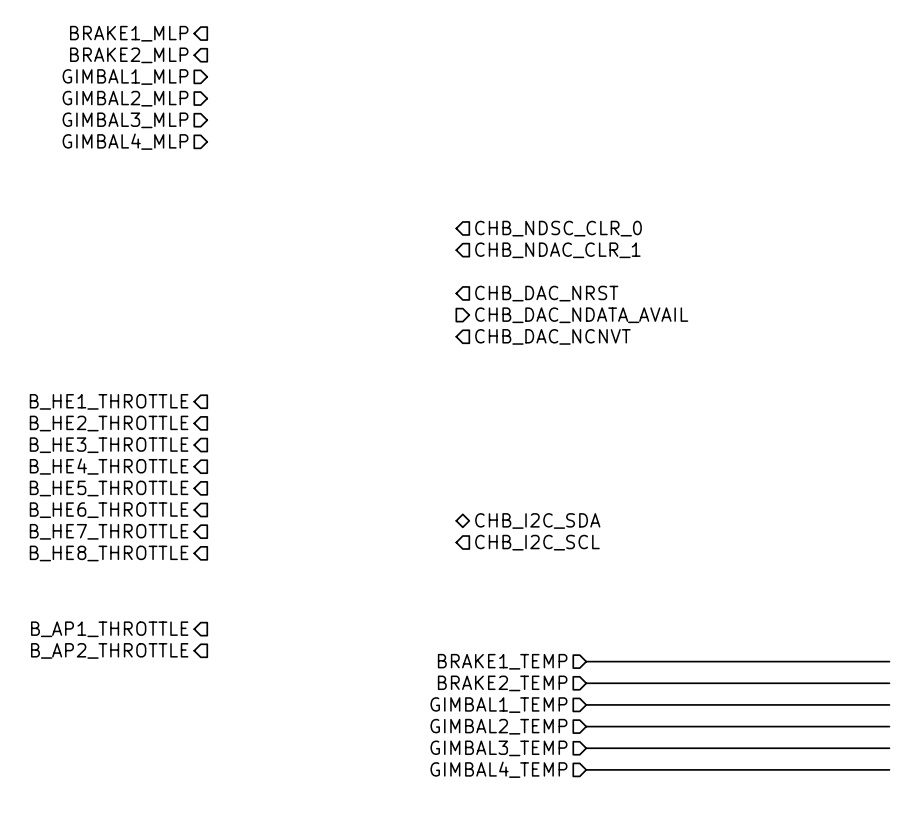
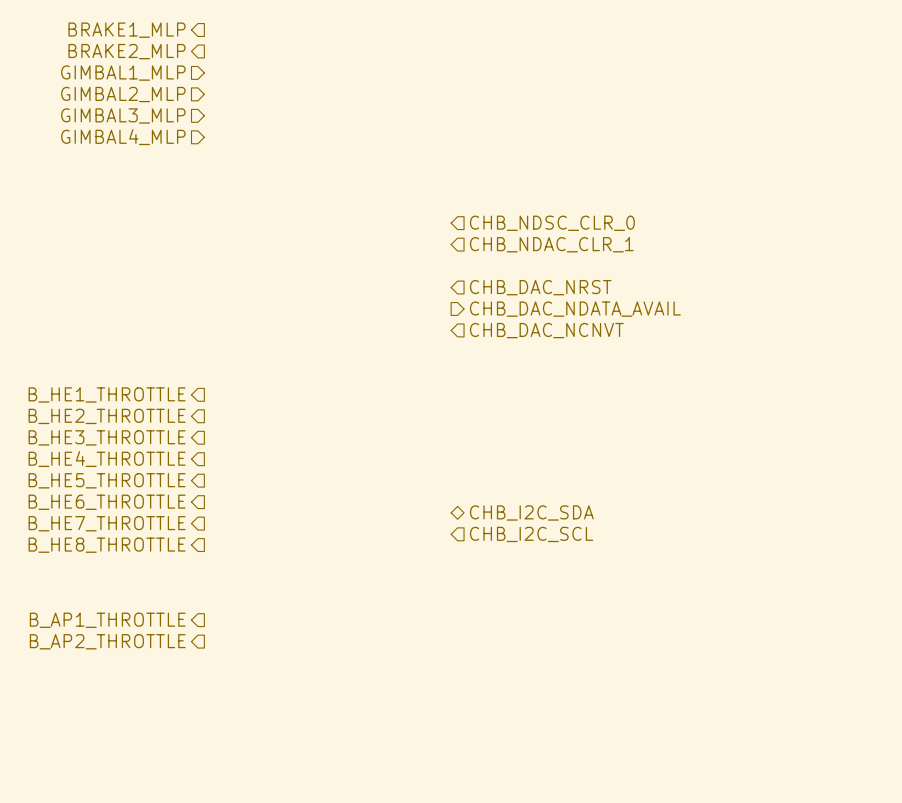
hierarchical label: BRAKE1_TEMP (502, 661) -> none
wire: (586, 661) (889, 661) -> none
hierarchical label: BRAKE2_TEMP (502, 683) -> none
wire: (586, 683) (889, 683) -> none
wire: (586, 704) (889, 704) -> none
hierarchical label: GIMBAL1_TEMP (498, 705) -> none
hierarchical label: GIMBAL2_TEMP (498, 726) -> none
wire: (586, 726) (889, 726) -> none
hierarchical label: GIMBAL3_TEMP (498, 748) -> none
wire: (586, 748) (889, 748) -> none
hierarchical label: GIMBAL4_TEMP (498, 769) -> none
wire: (586, 769) (889, 769) -> none

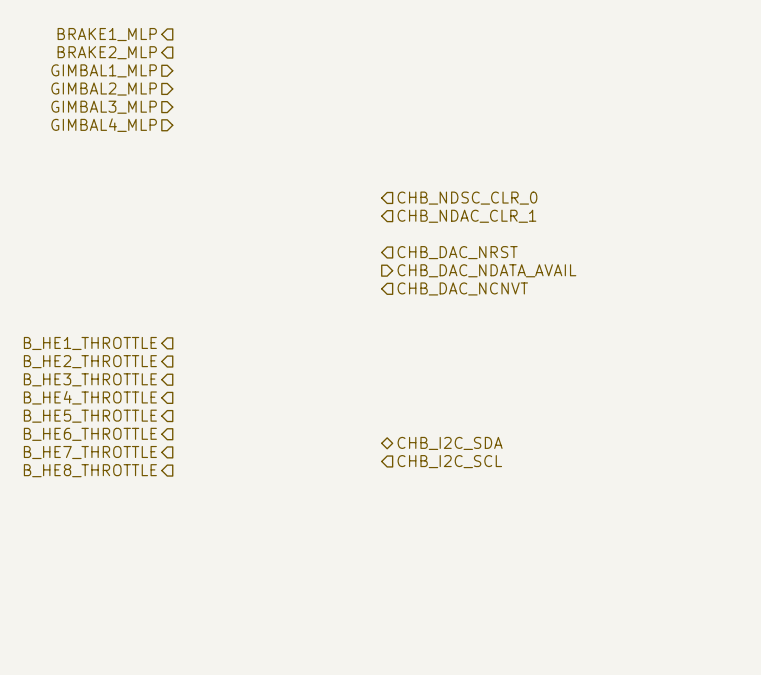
hierarchical label: B_AP1_THROTTLE (107, 620) -> none
hierarchical label: B_AP2_THROTTLE (107, 641) -> none

